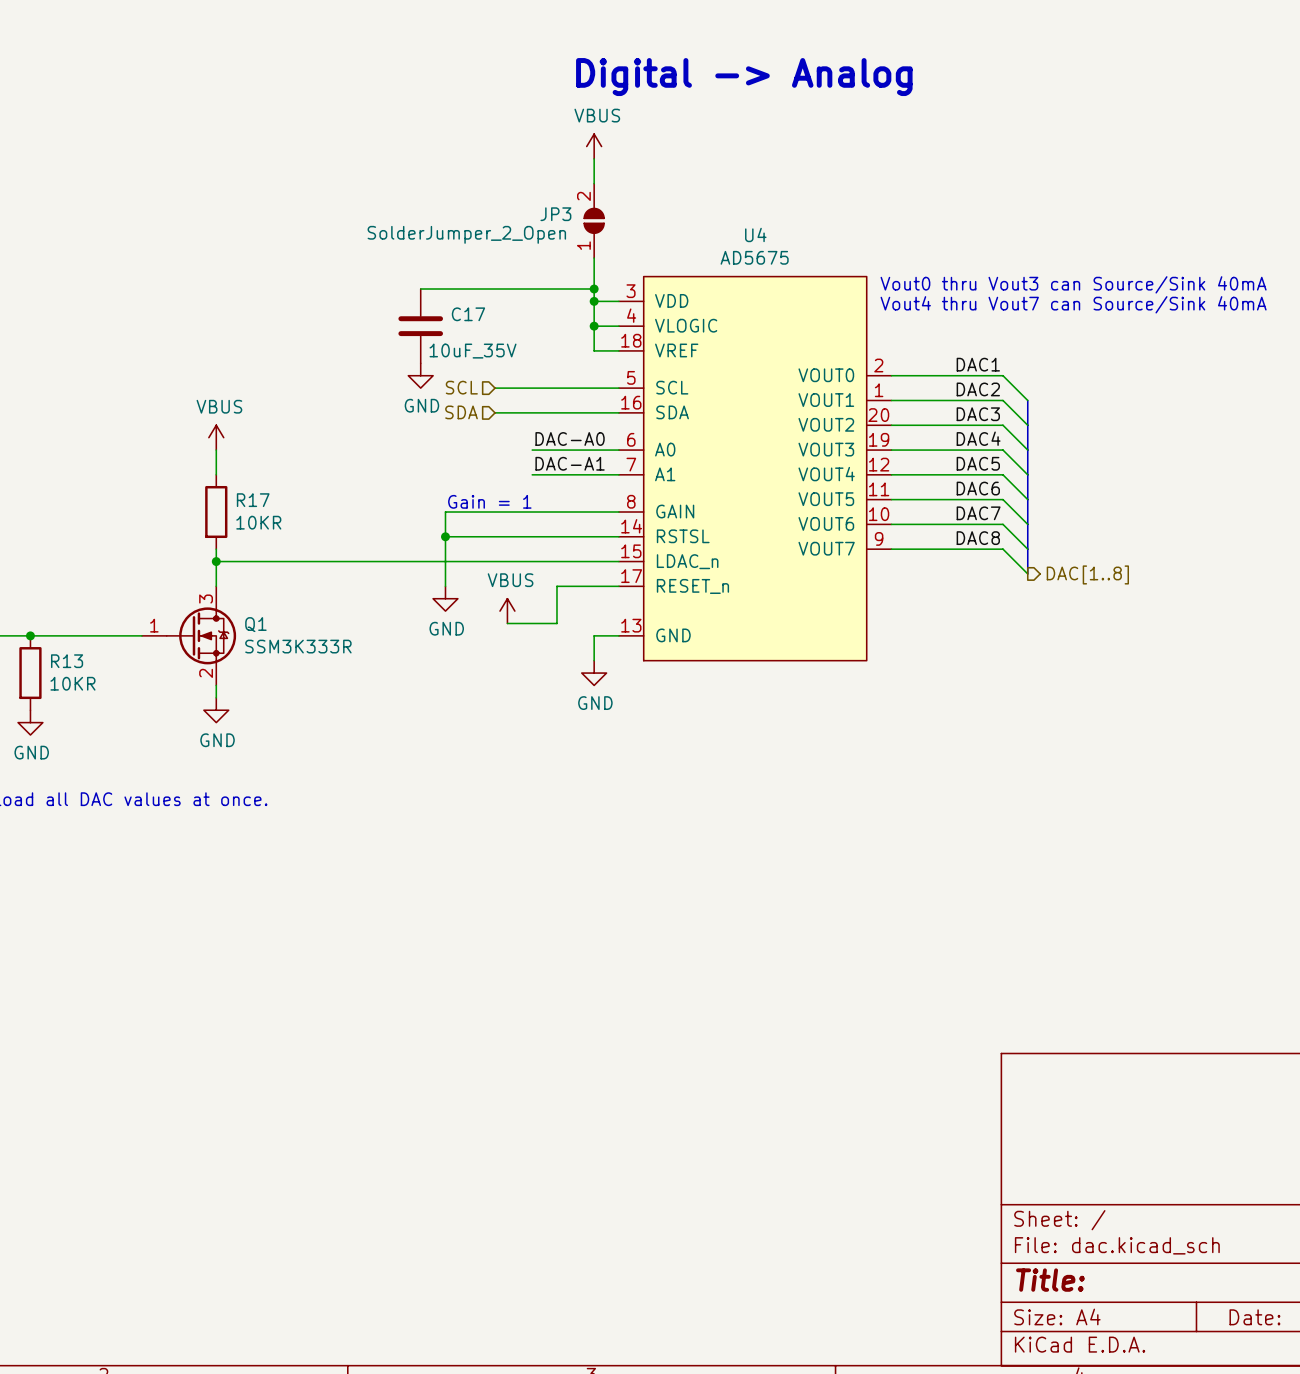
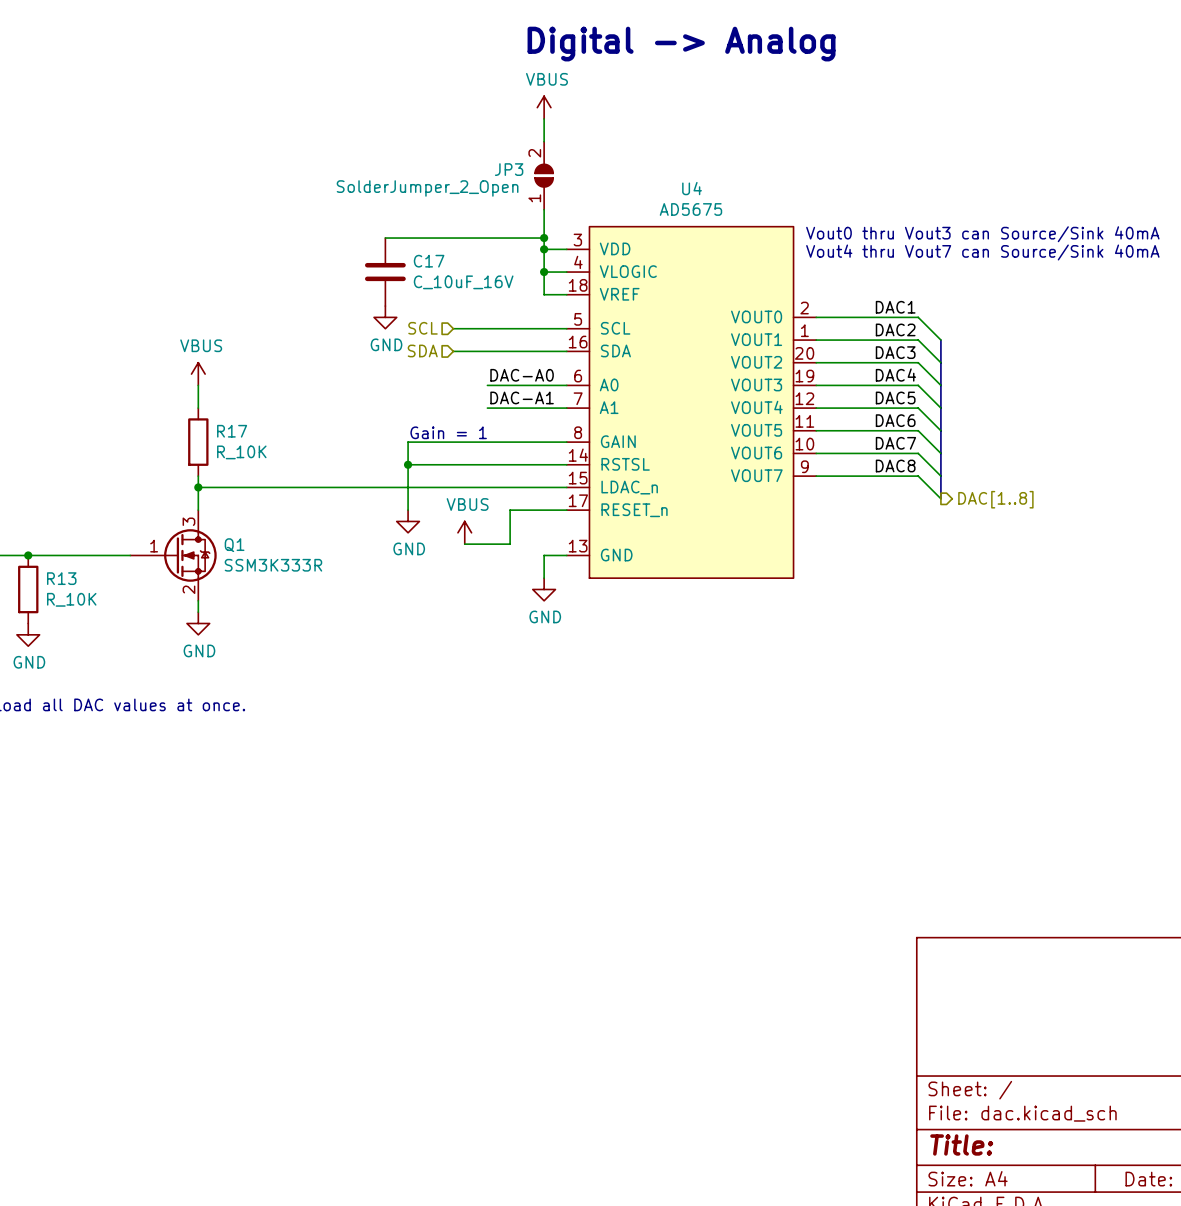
C17 value: 10uF_35V (473, 351) -> C_10uF_16V (463, 282)
R17 value: 10KR (258, 522) -> R_10K (241, 452)
Q1 symbol: [141, 586, 237, 686] -> [130, 510, 217, 601]
R13 value: 10KR (72, 683) -> R_10K (71, 599)

